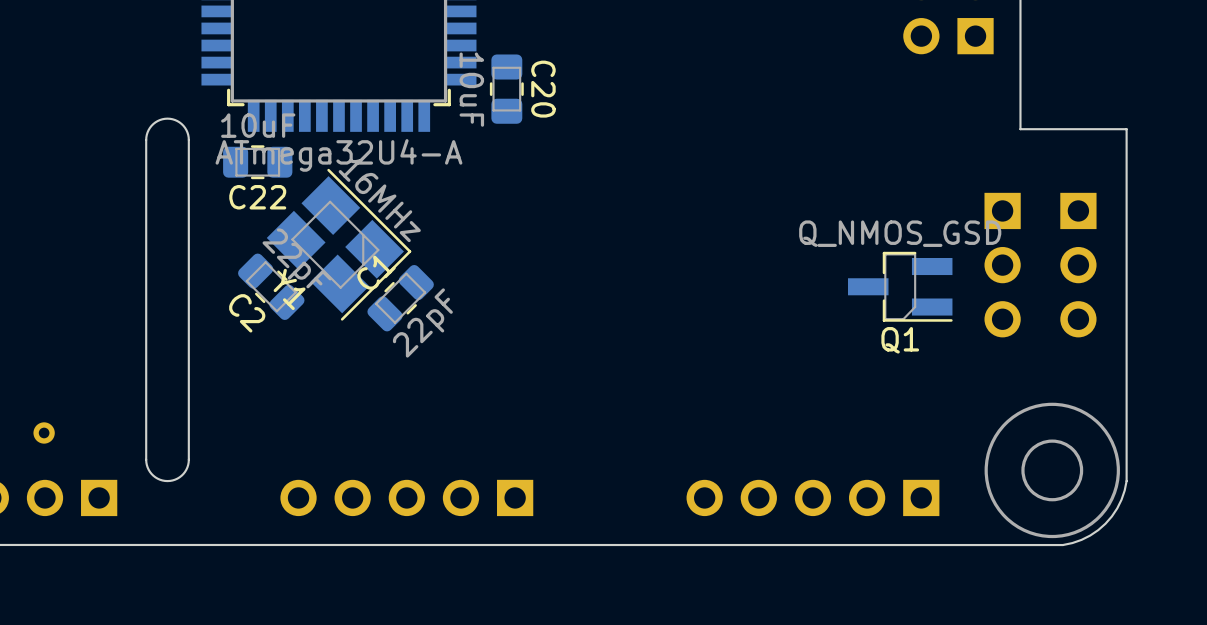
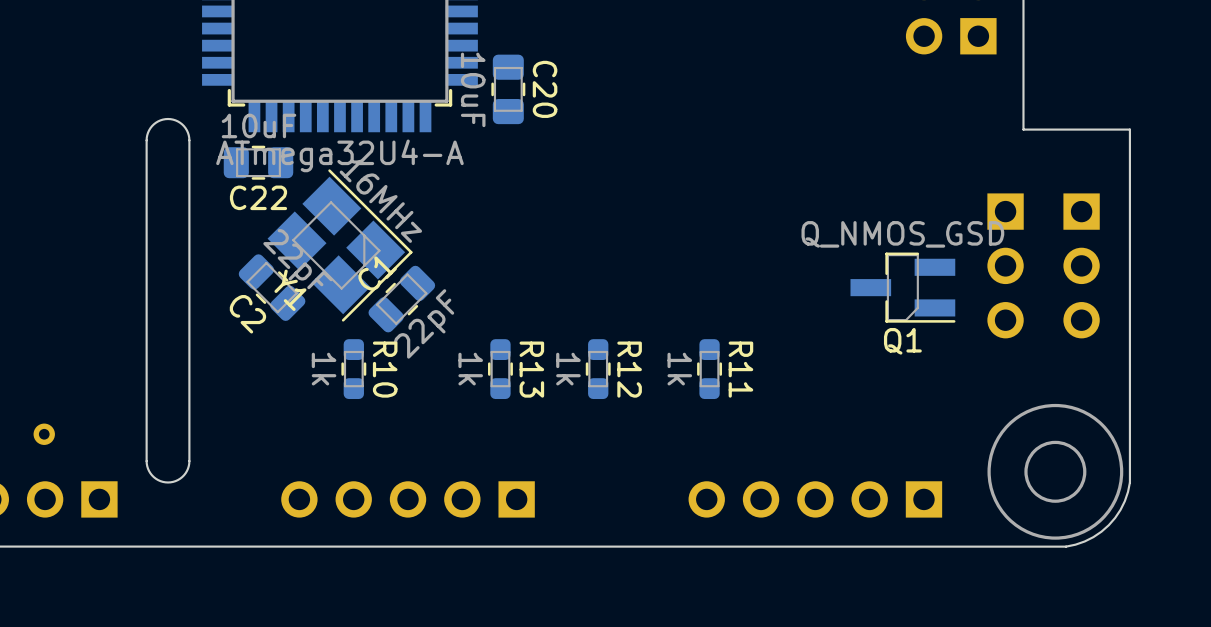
R10: none -> 1k (353, 369)
R13: none -> 1k (500, 369)
R12: none -> 1k (598, 369)
R11: none -> 1k (709, 369)

